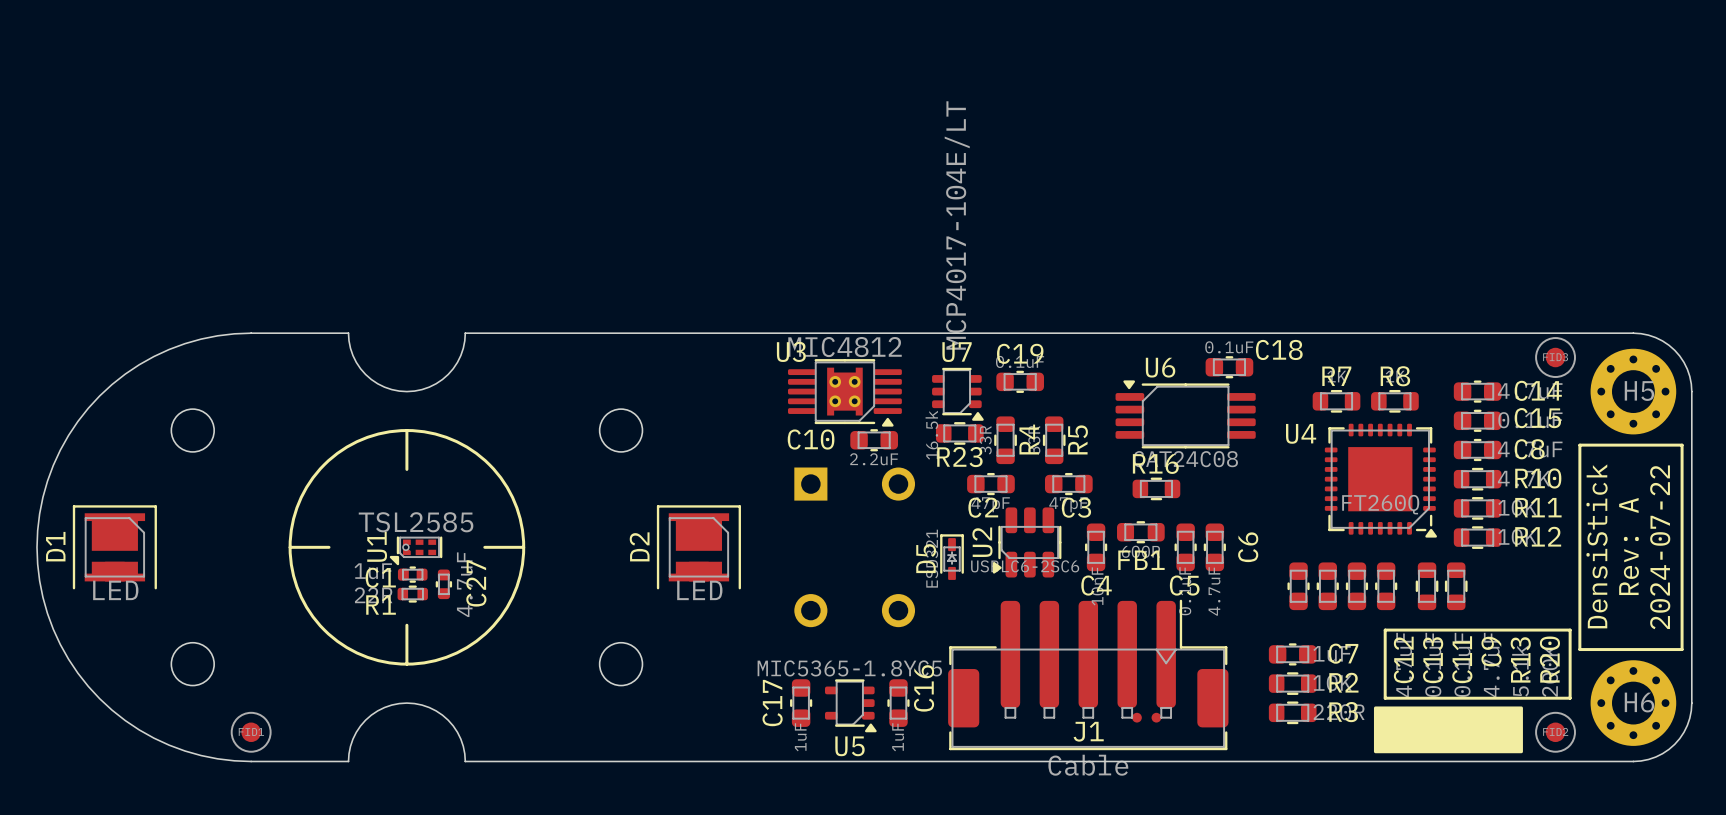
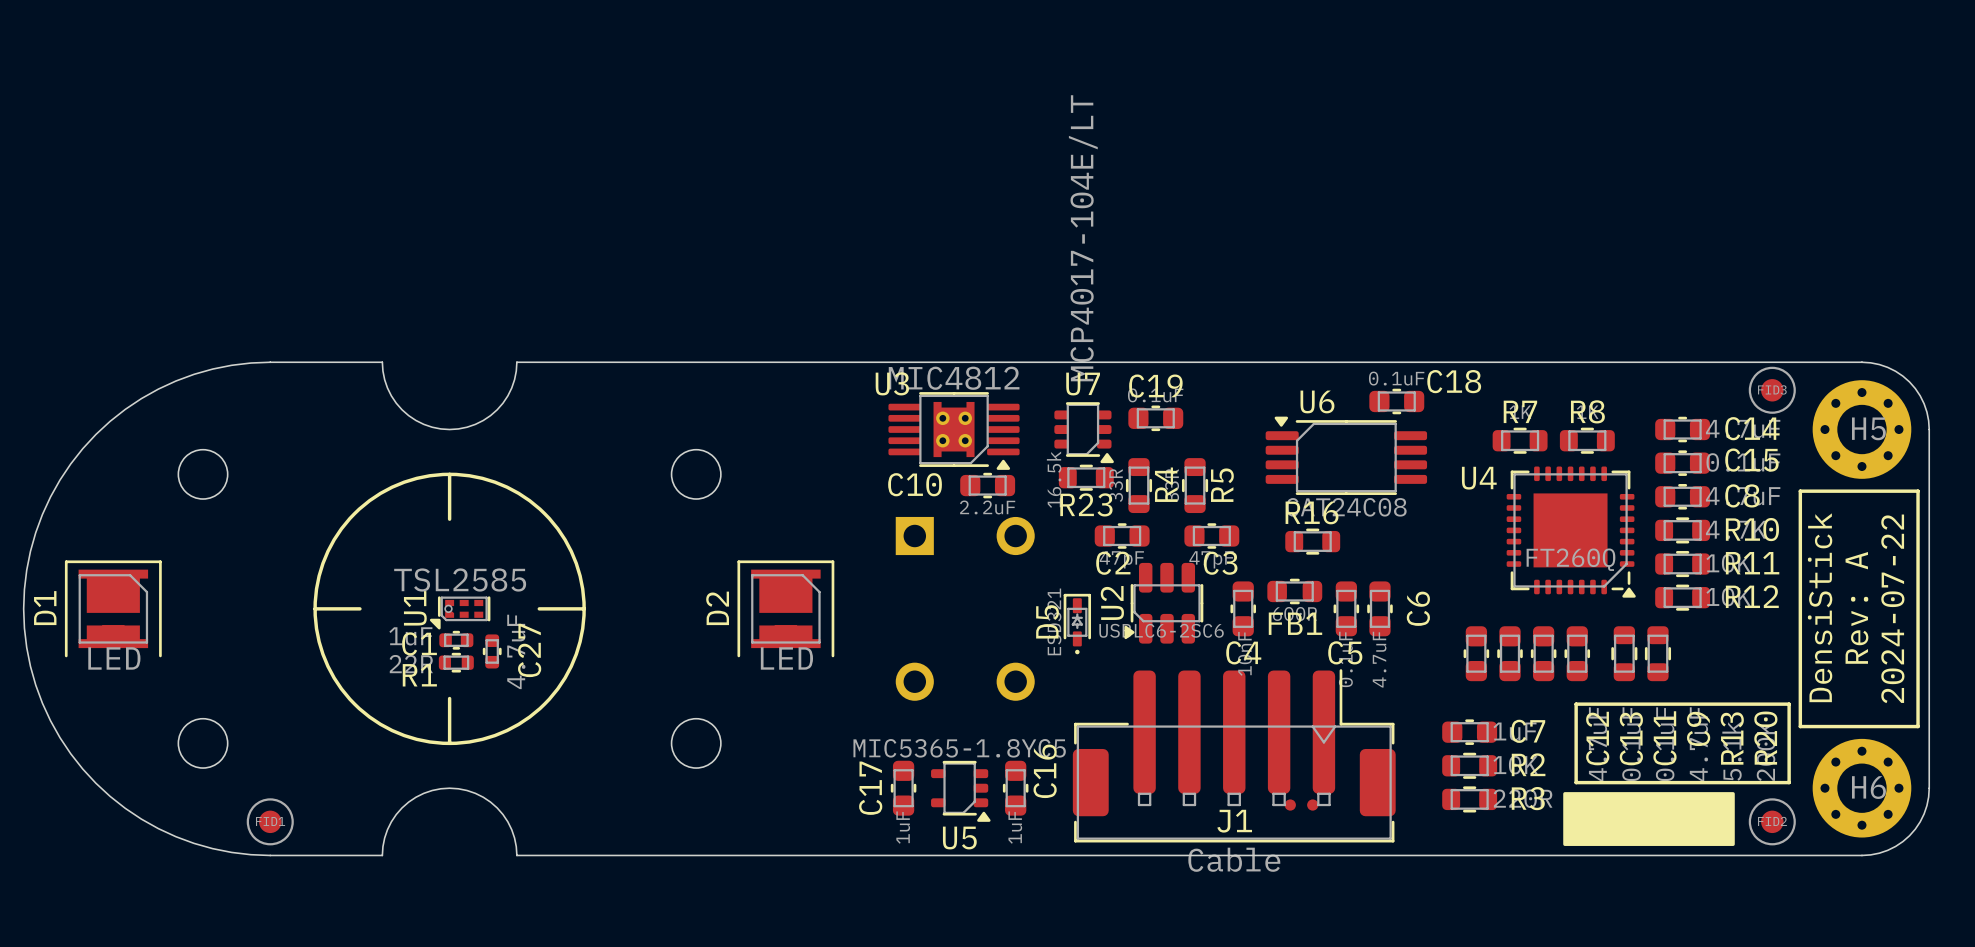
D5 footprint: [940, 534, 964, 580] -> [1063, 593, 1092, 655]

